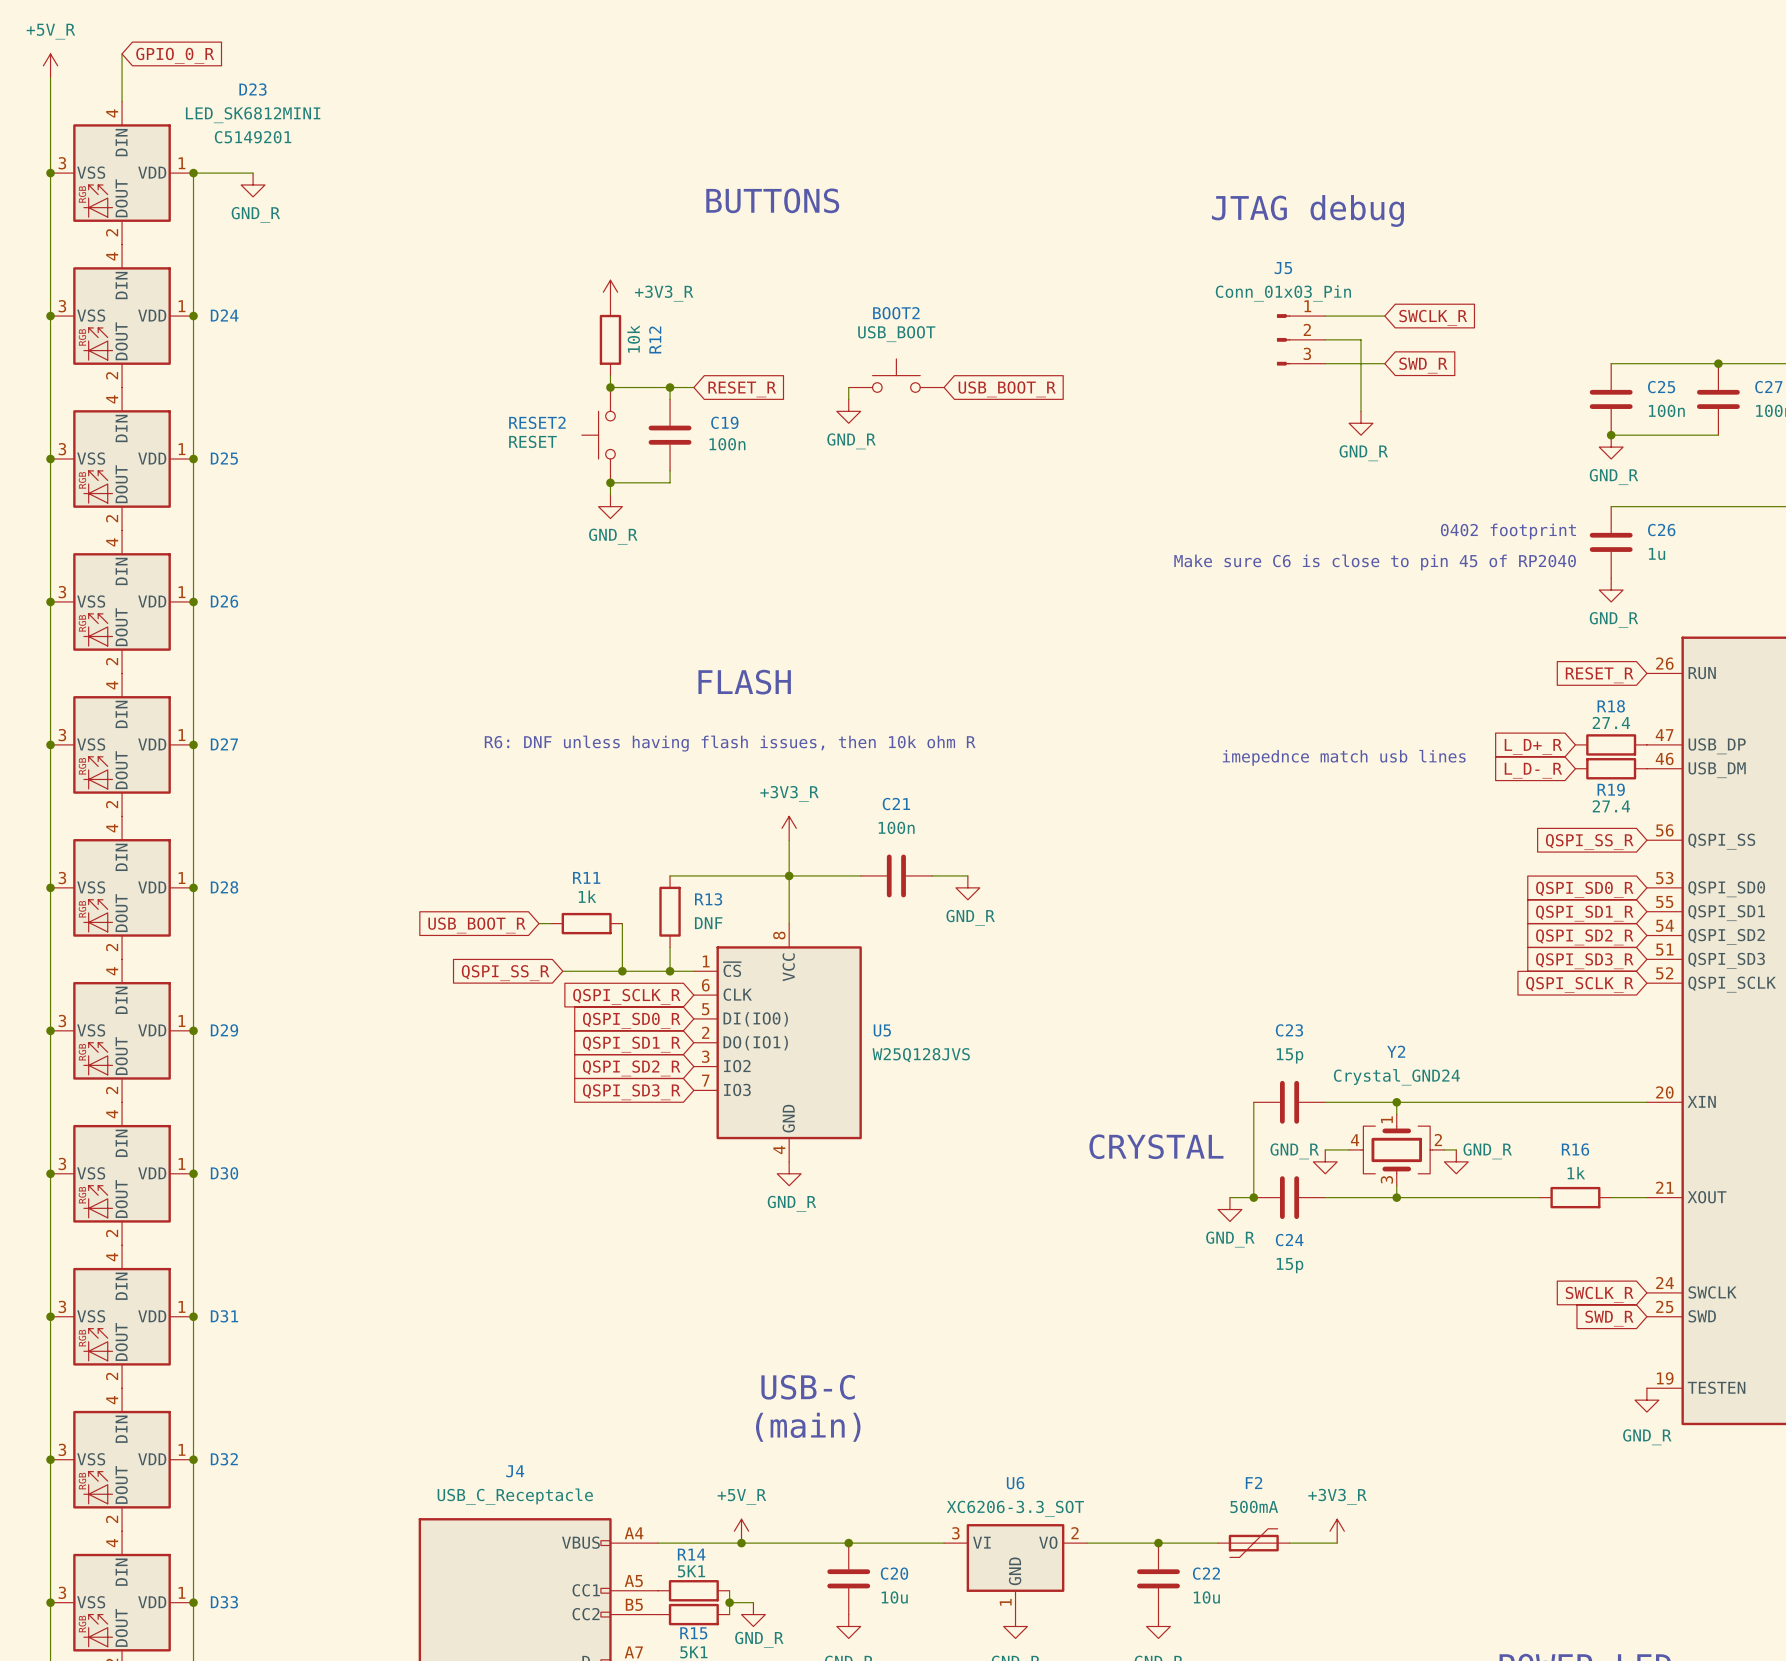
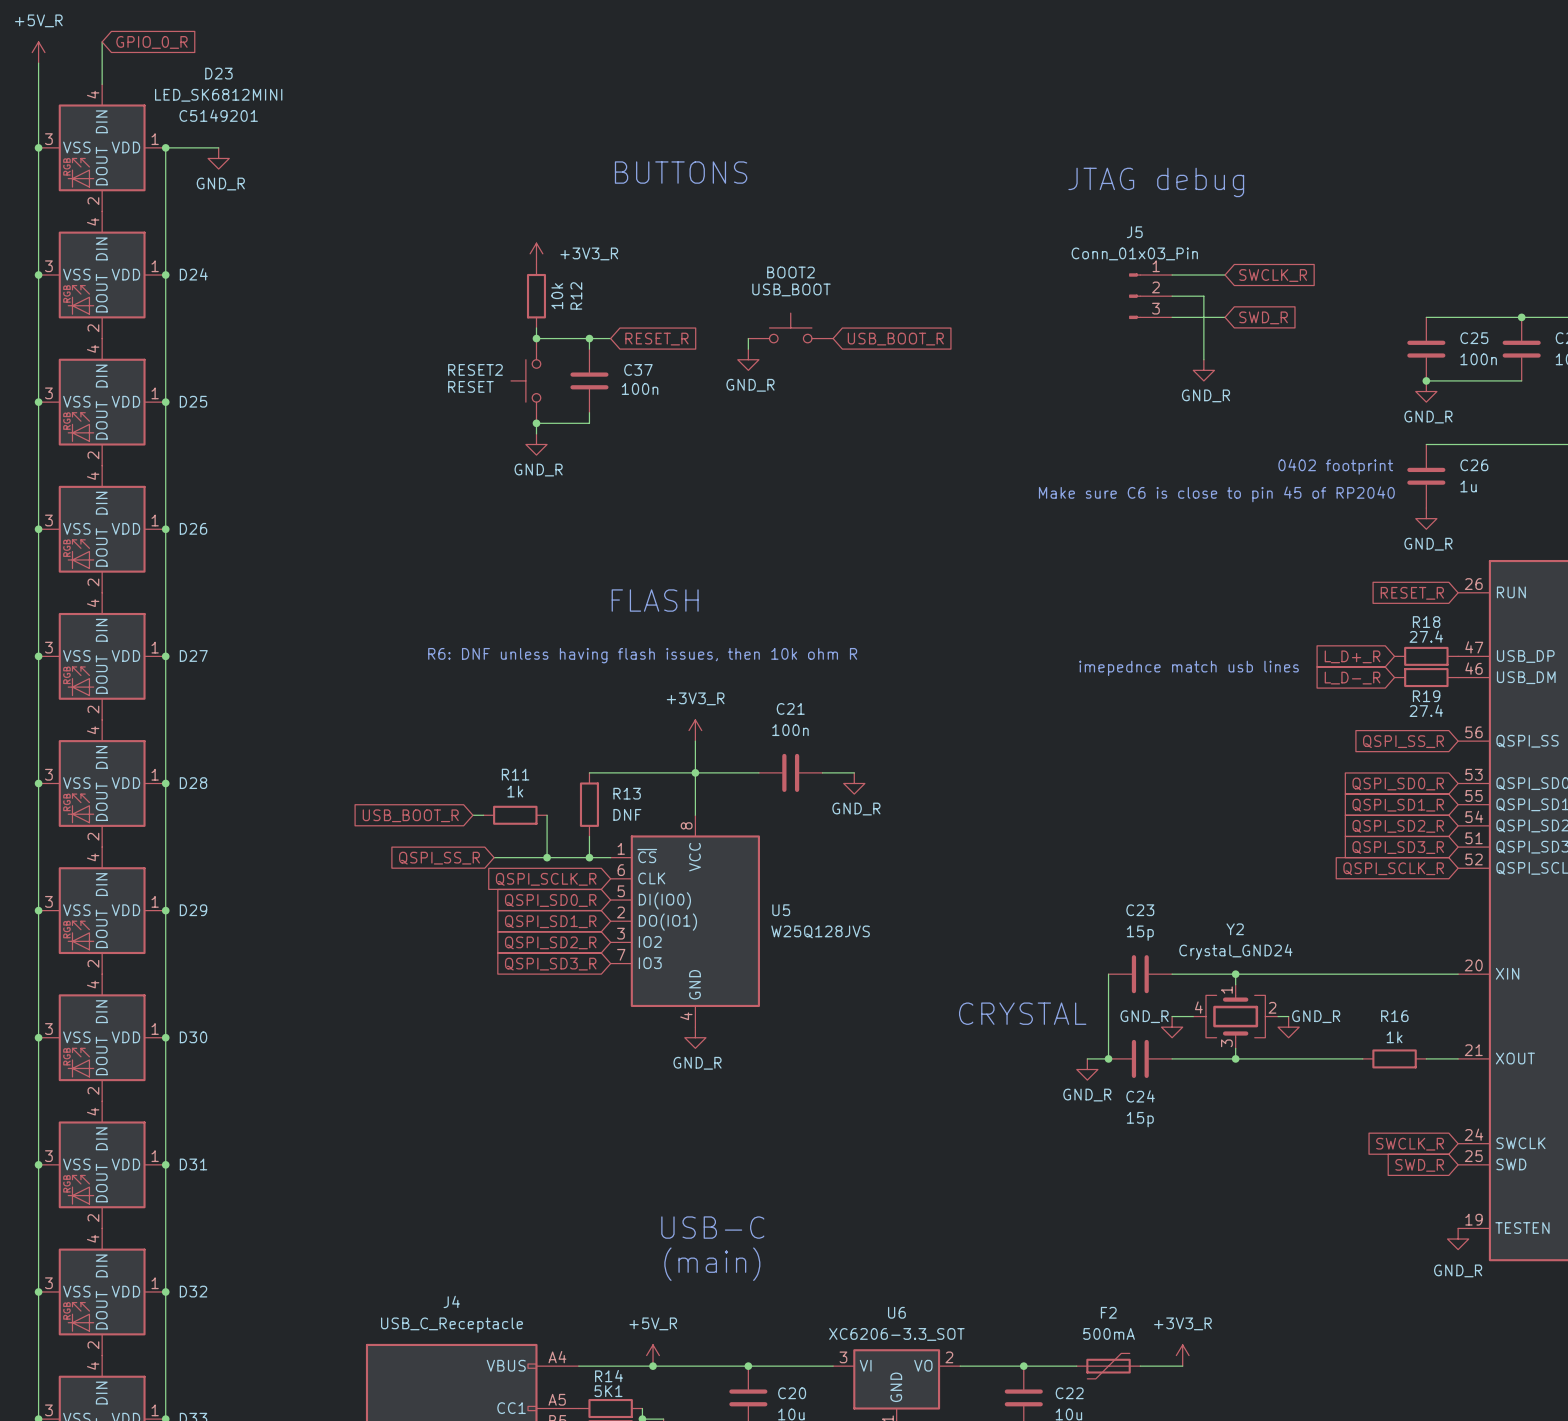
C19 name: C19 (724, 422) -> C37 (638, 369)

